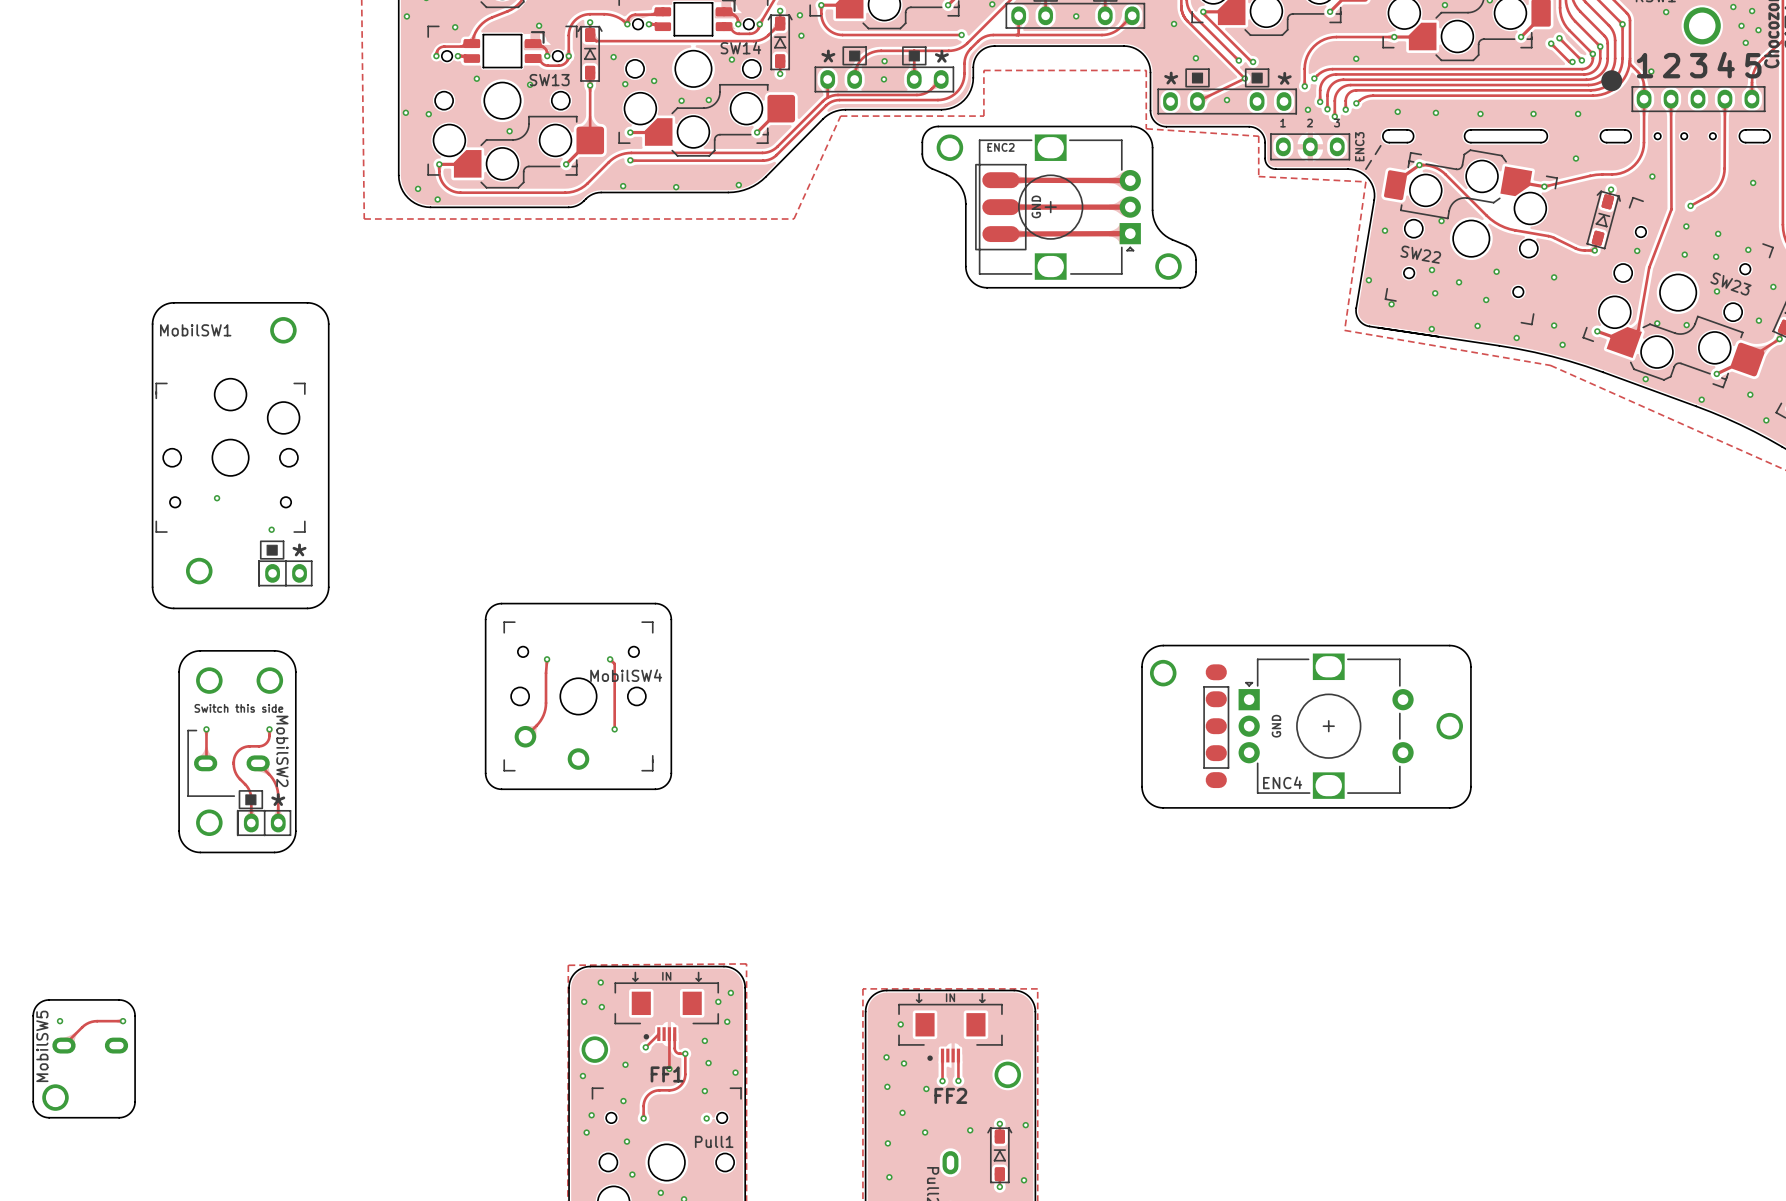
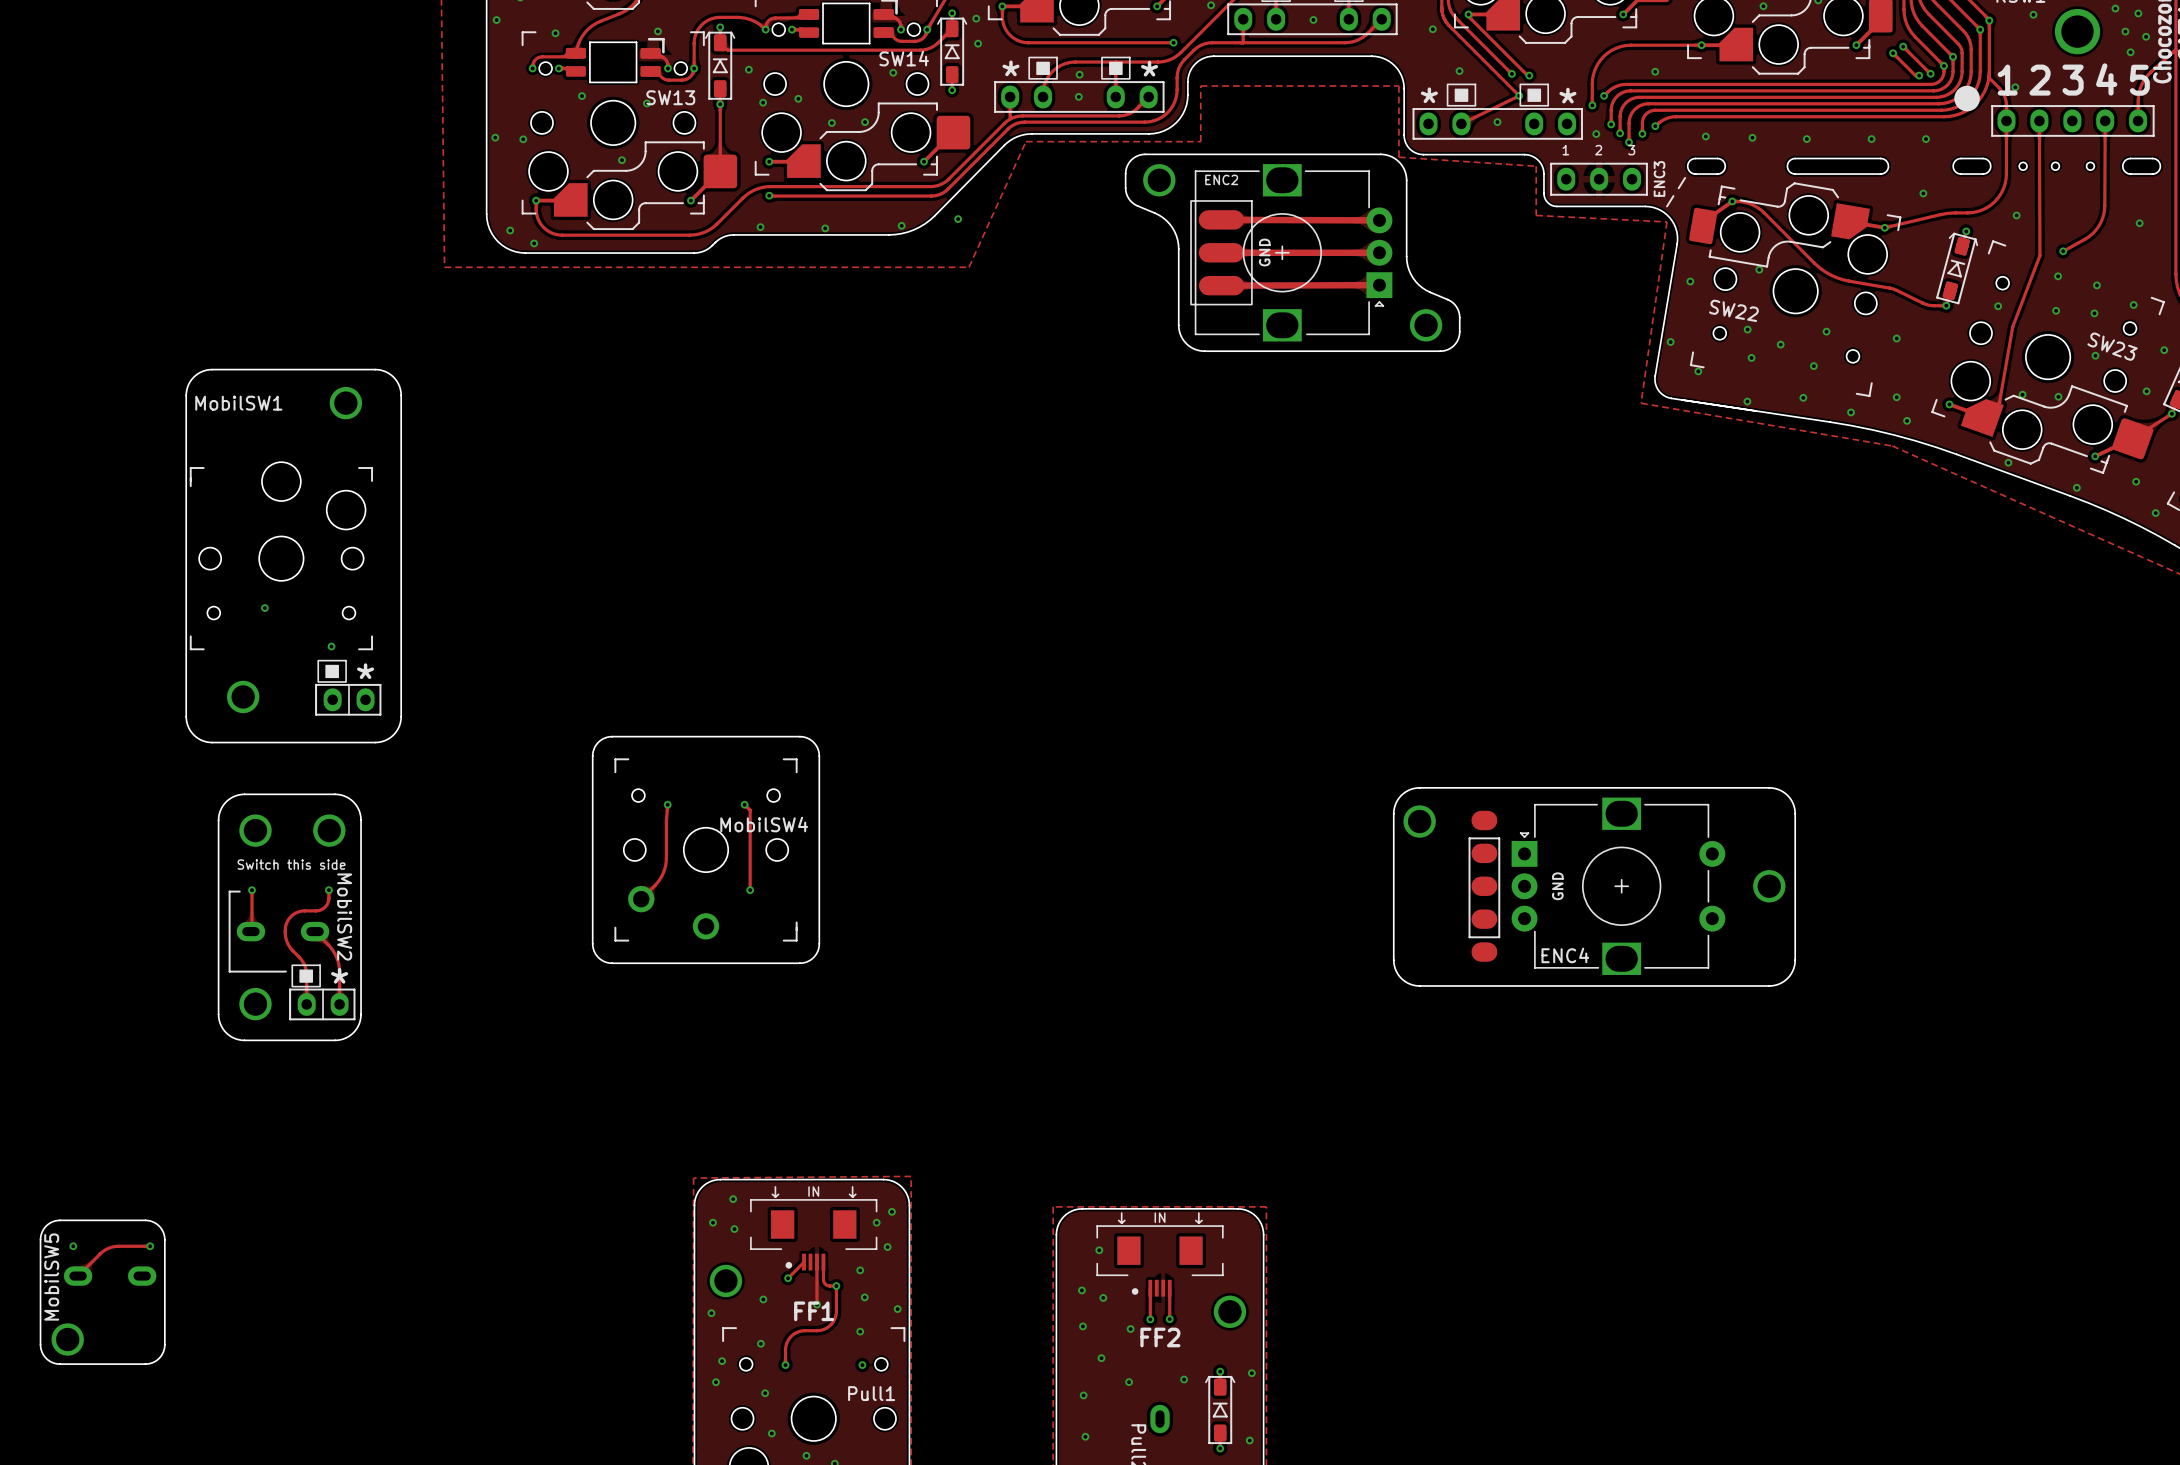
via: none -> (1989, 20)
via: none -> (958, 219)

